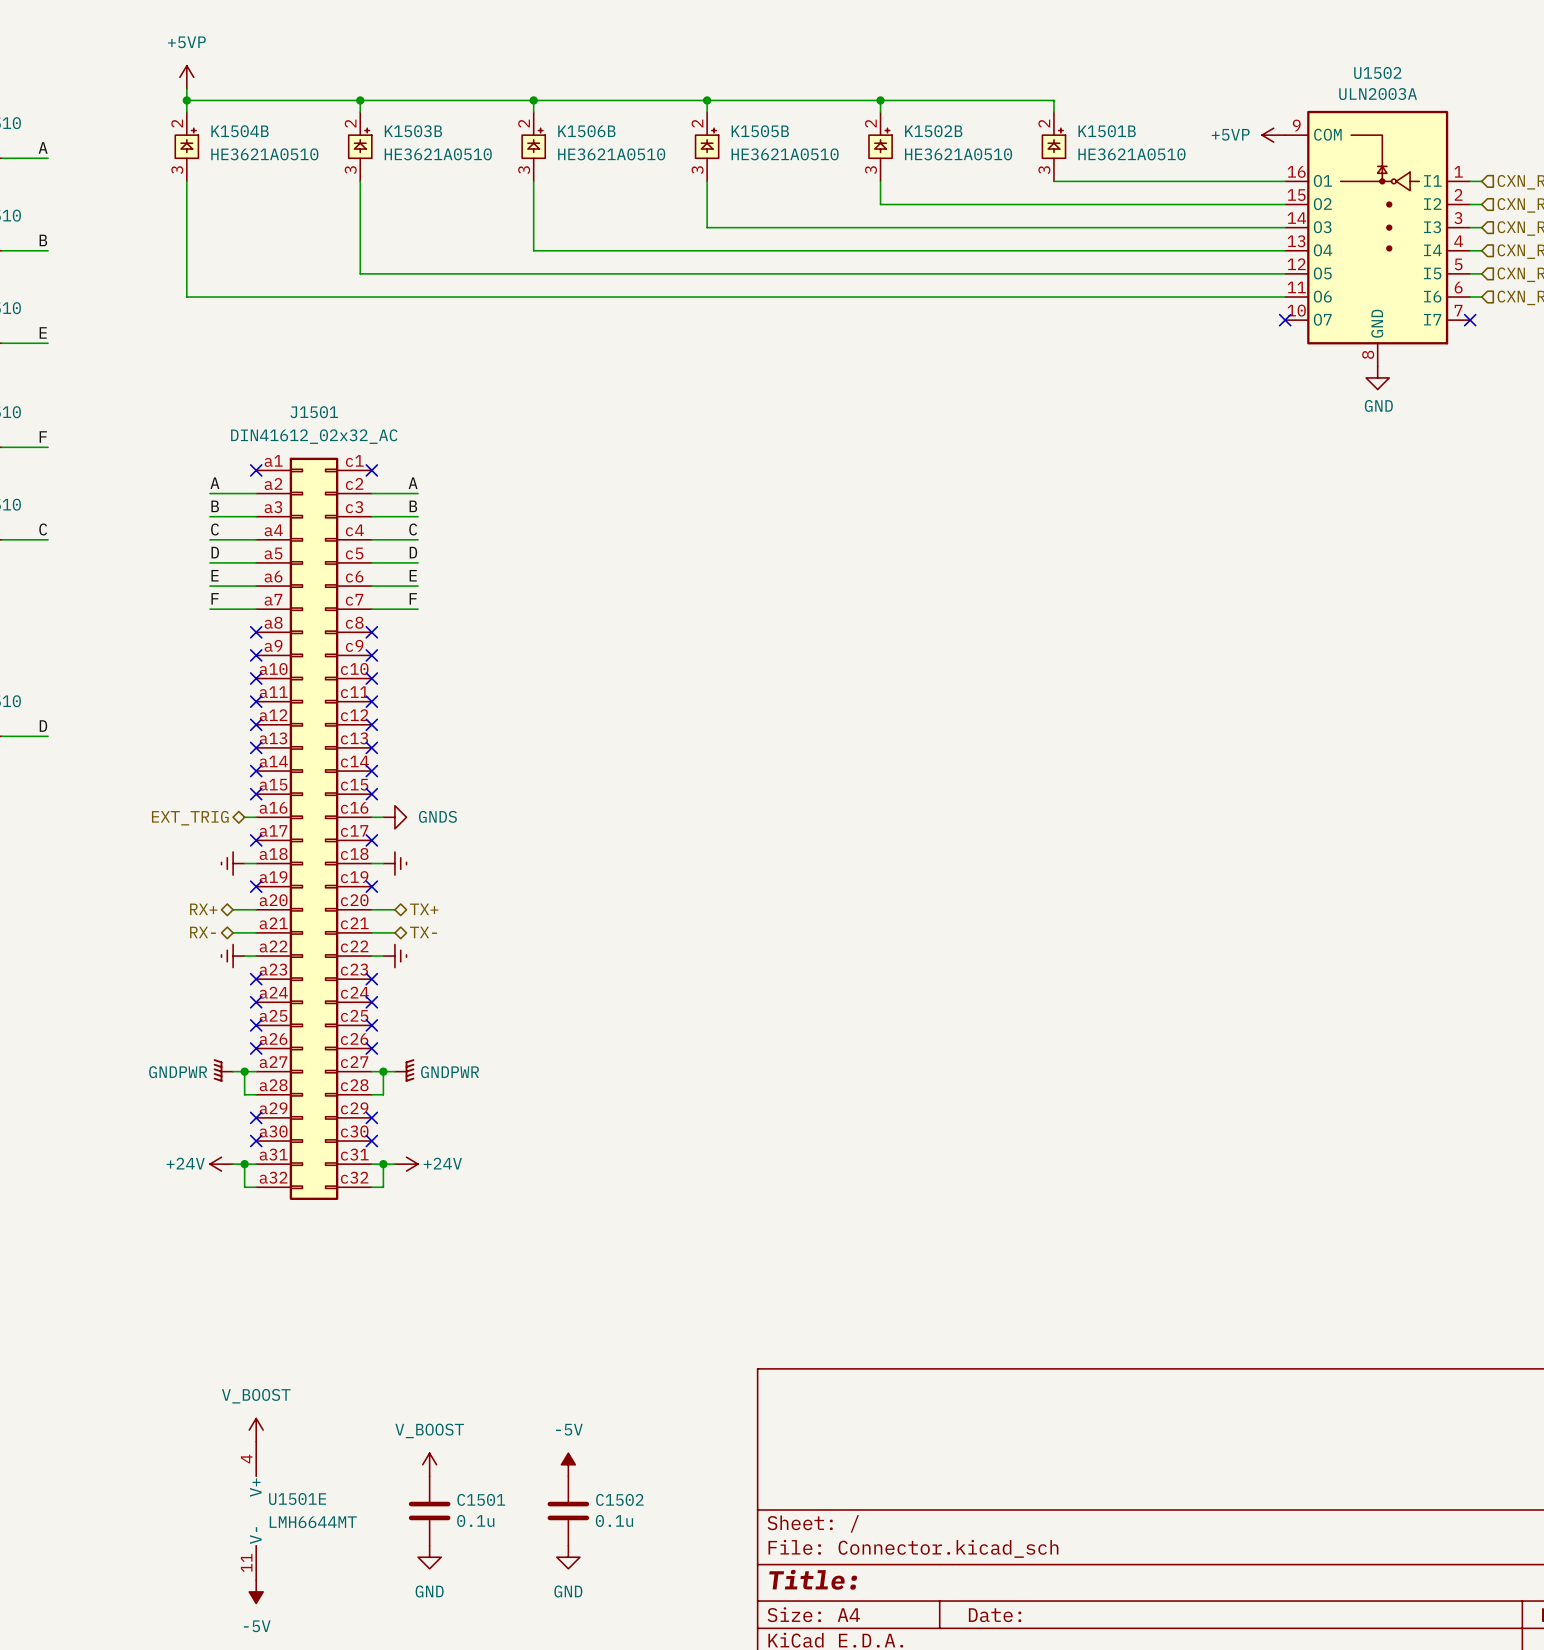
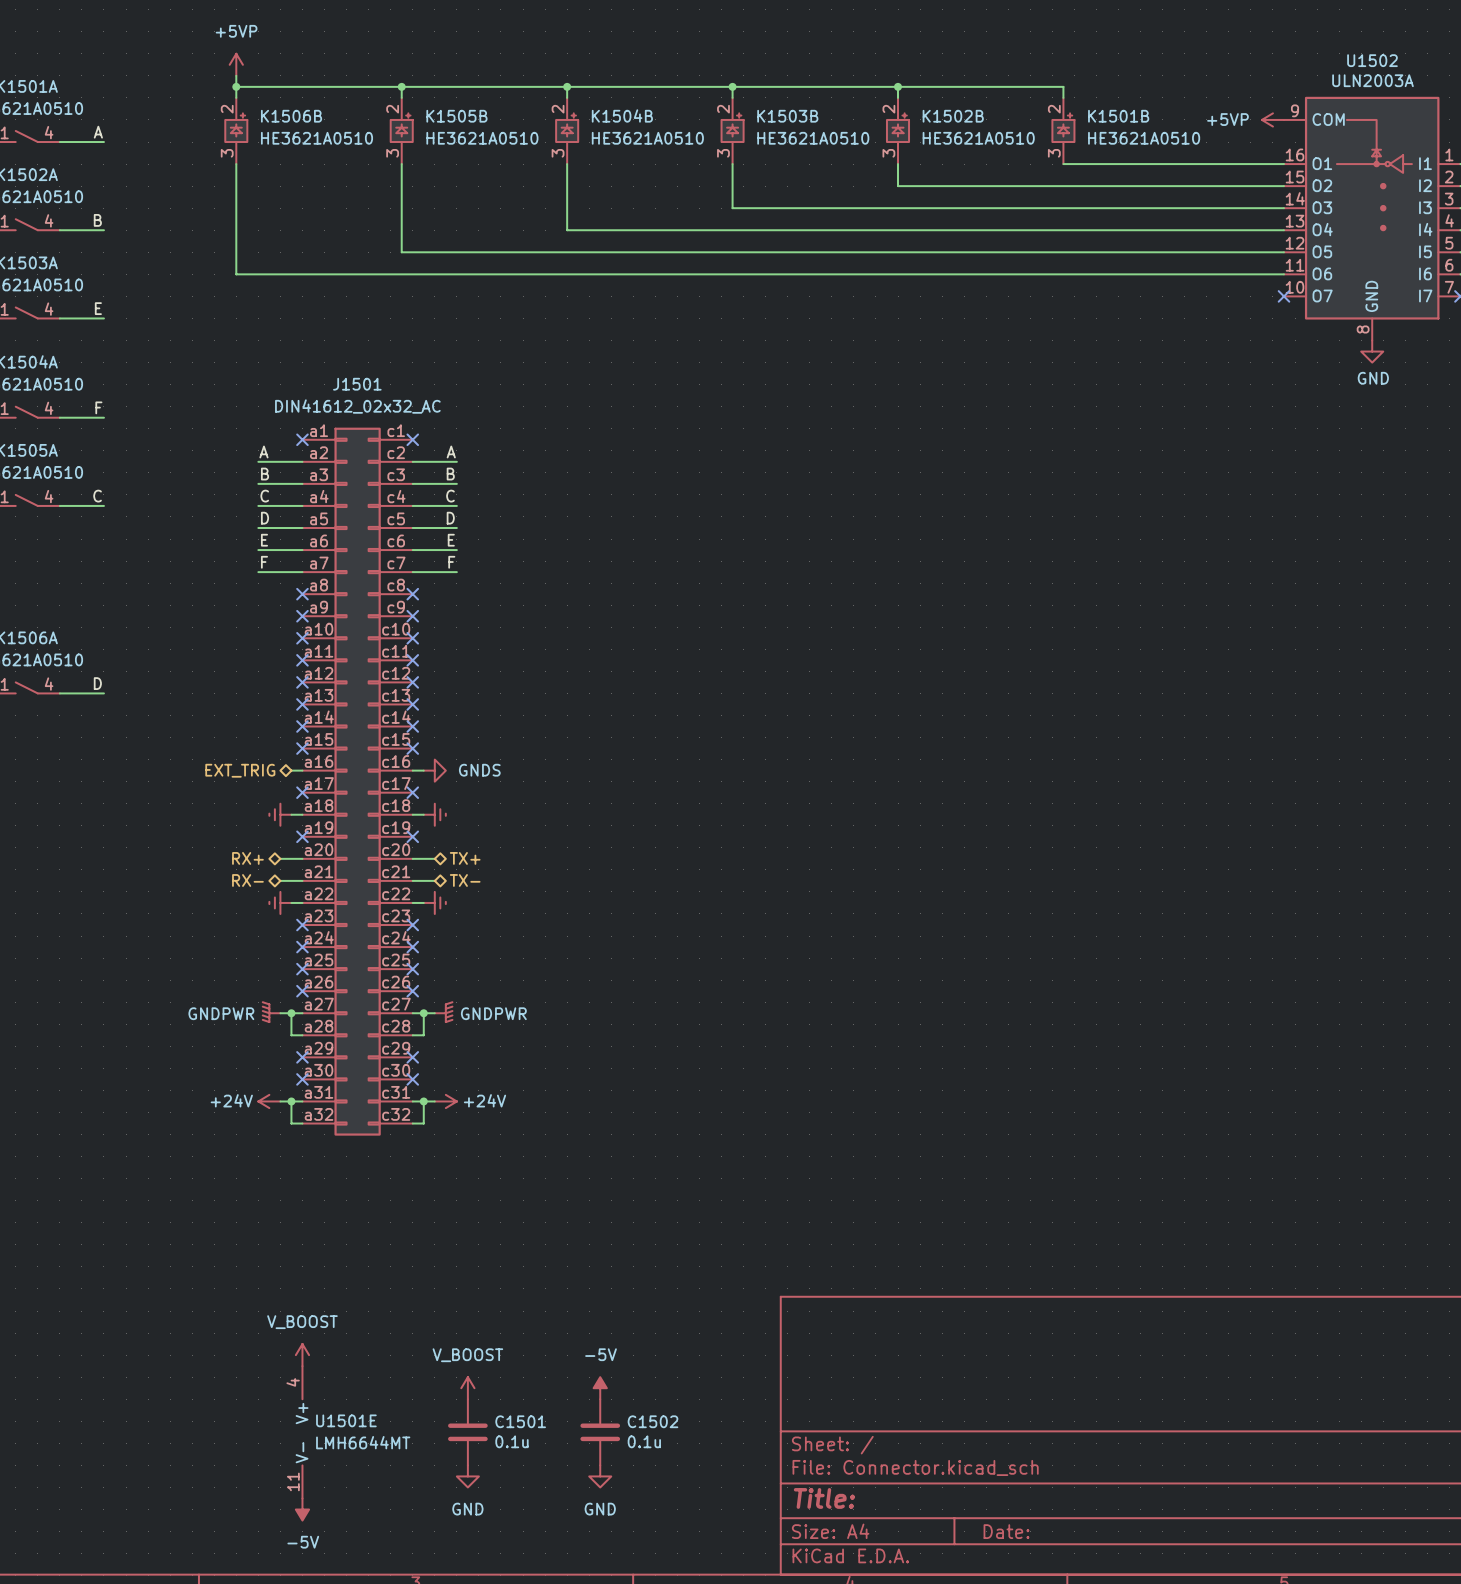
K1504B name: K1504B (240, 131) -> K1506B (291, 116)
K1503B name: K1503B (413, 131) -> K1505B (456, 116)
K1506B name: K1506B (586, 131) -> K1504B (622, 115)
K1505B name: K1505B (760, 131) -> K1503B (787, 116)

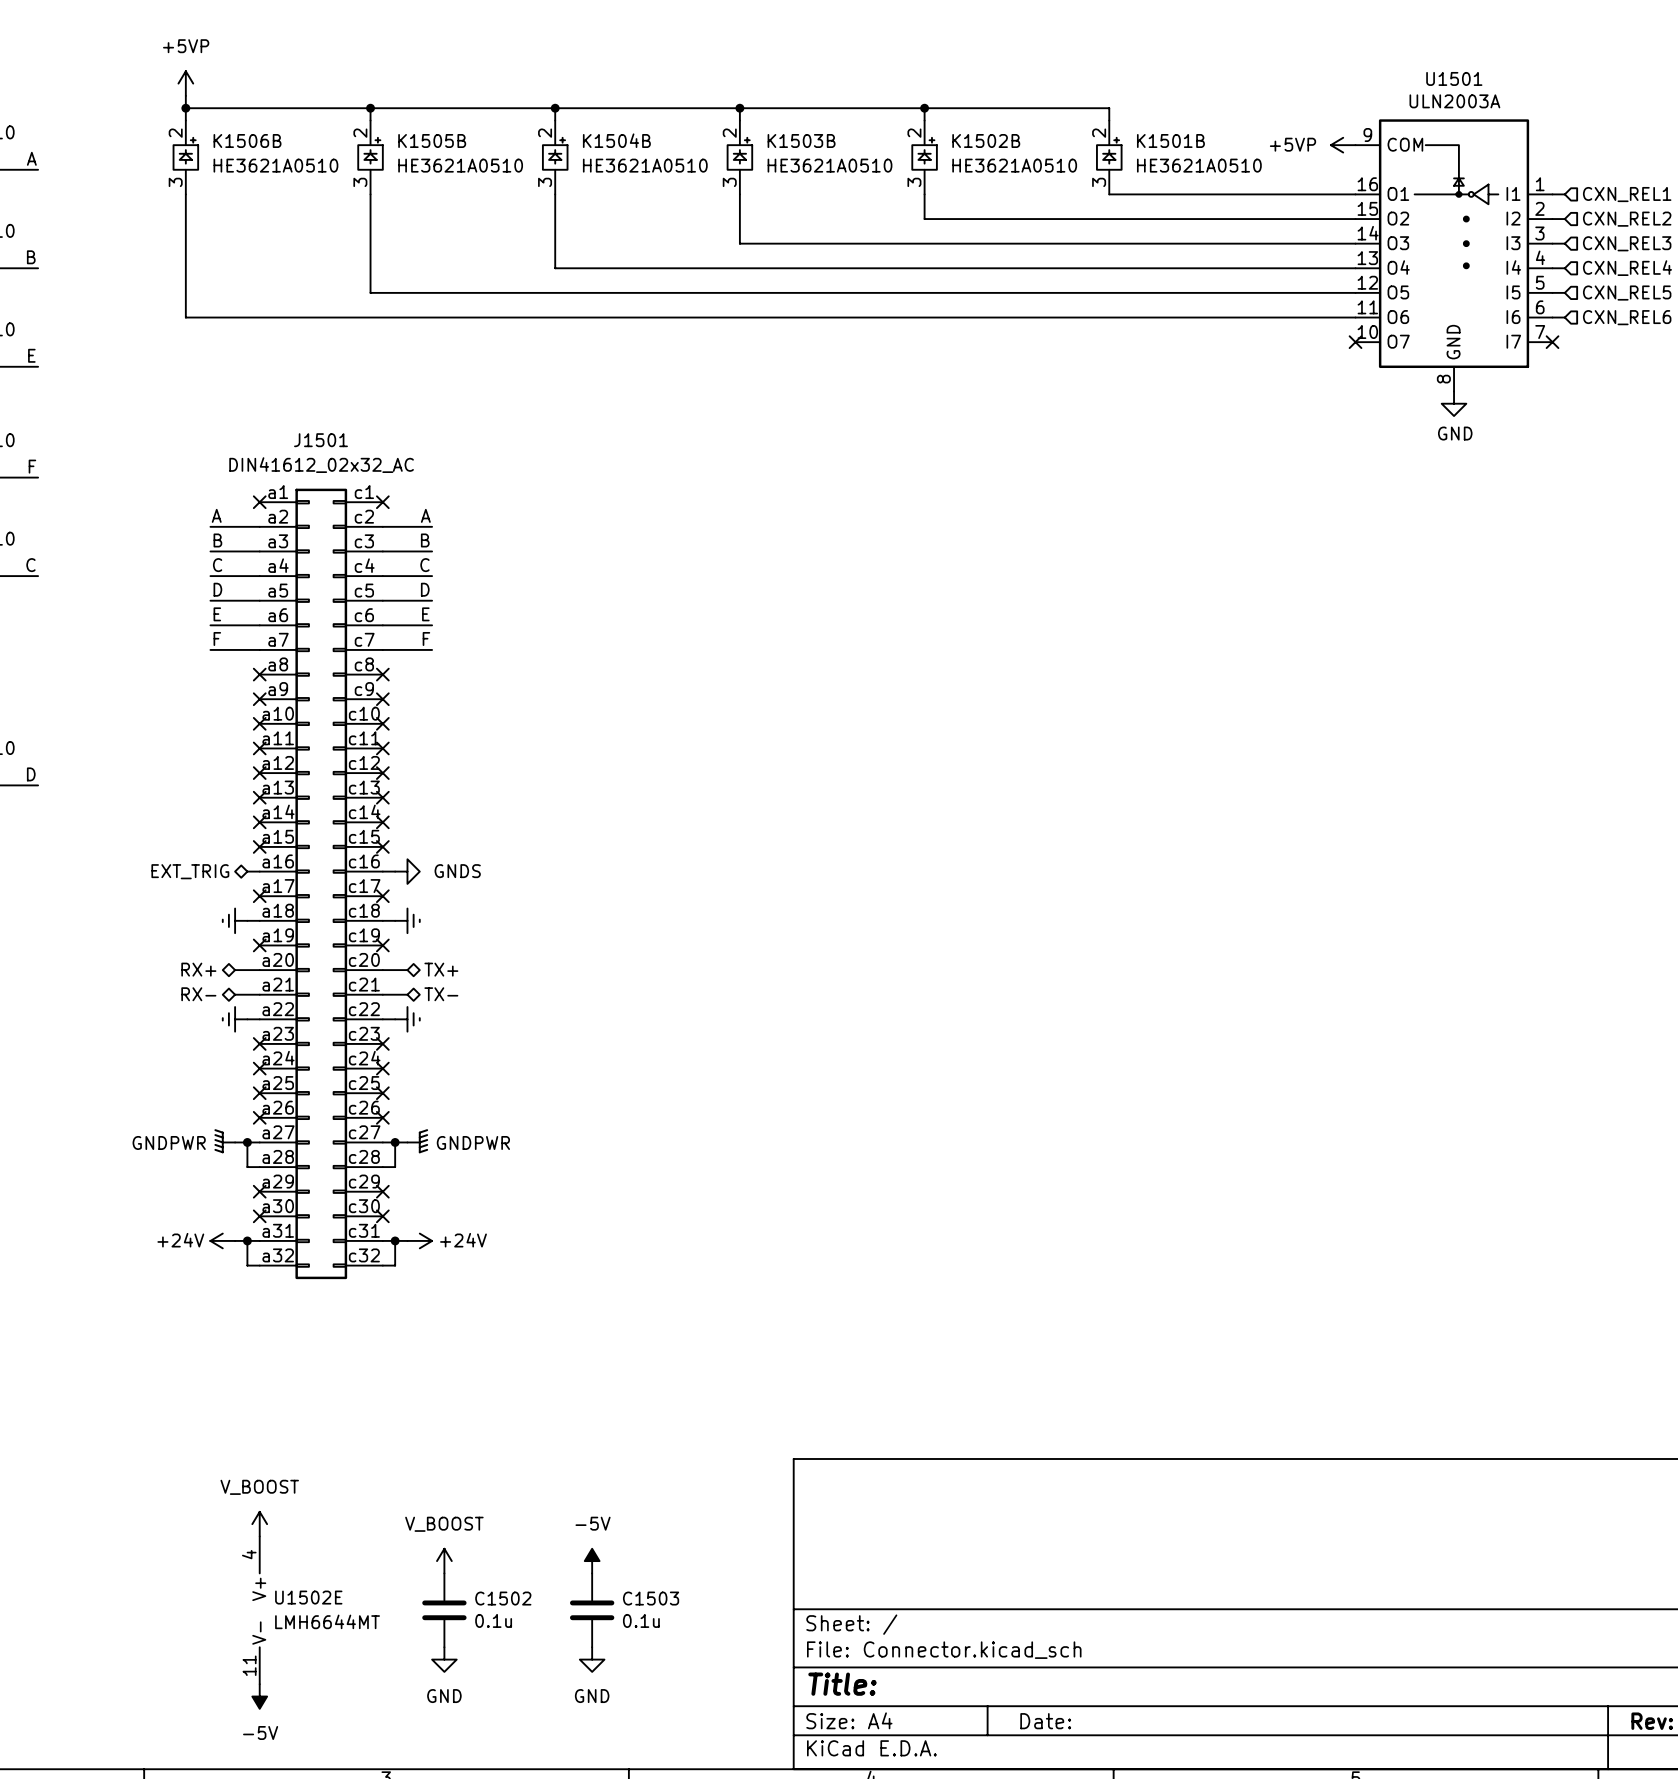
U1502 name: U1502 (1372, 60) -> U1501 (1454, 78)
U1501E name: U1501E (346, 1420) -> U1502E (308, 1597)
C1501 name: C1501 (520, 1421) -> C1502 (503, 1598)
C1502 name: C1502 (652, 1421) -> C1503 (651, 1598)

